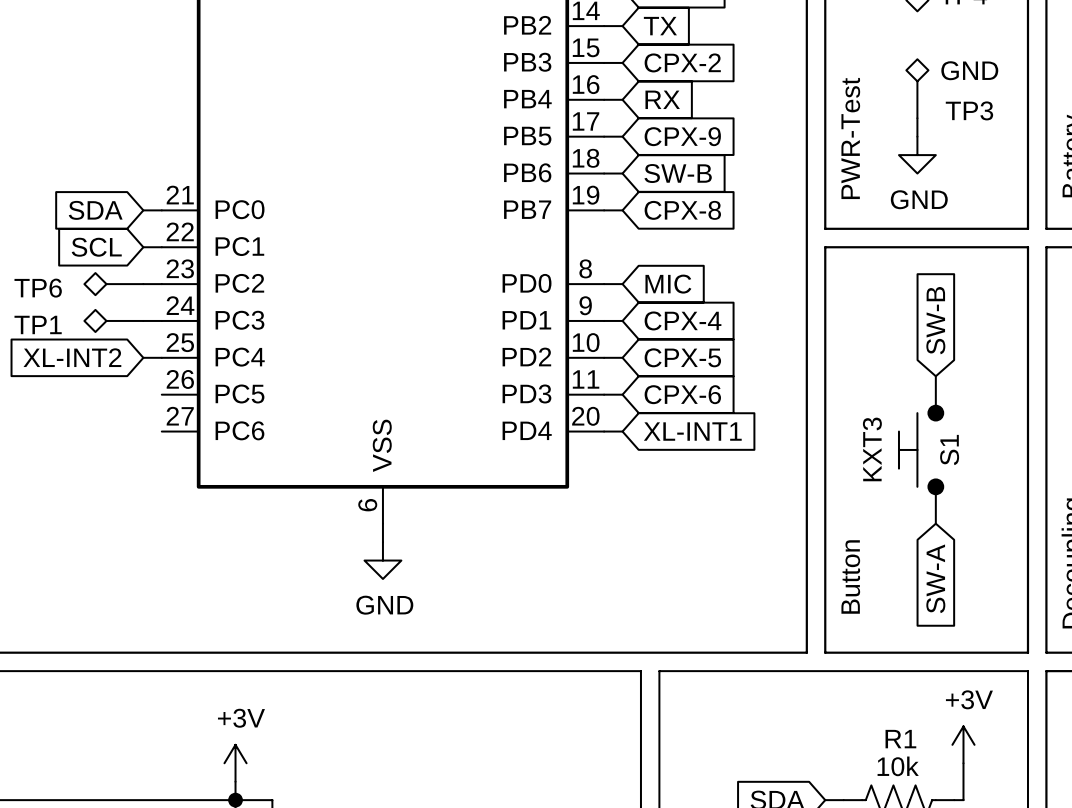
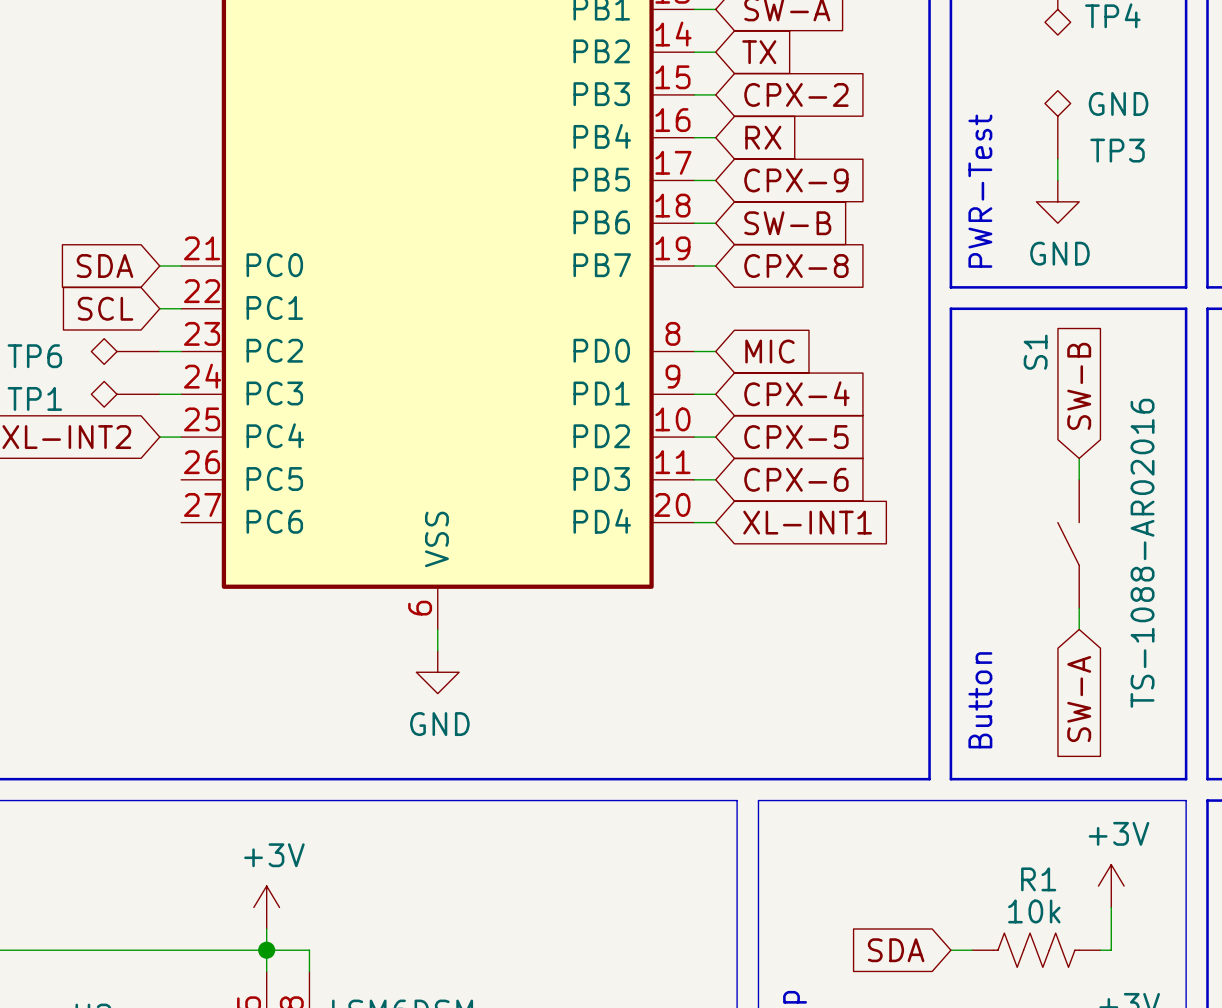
S1 symbol: [898, 405, 944, 495] -> [1057, 479, 1080, 609]
S1 value: KXT3 (872, 449) -> TS-1088-AR02016 (1142, 553)
S1 name position: S1 (949, 450) -> S1 (1035, 352)

